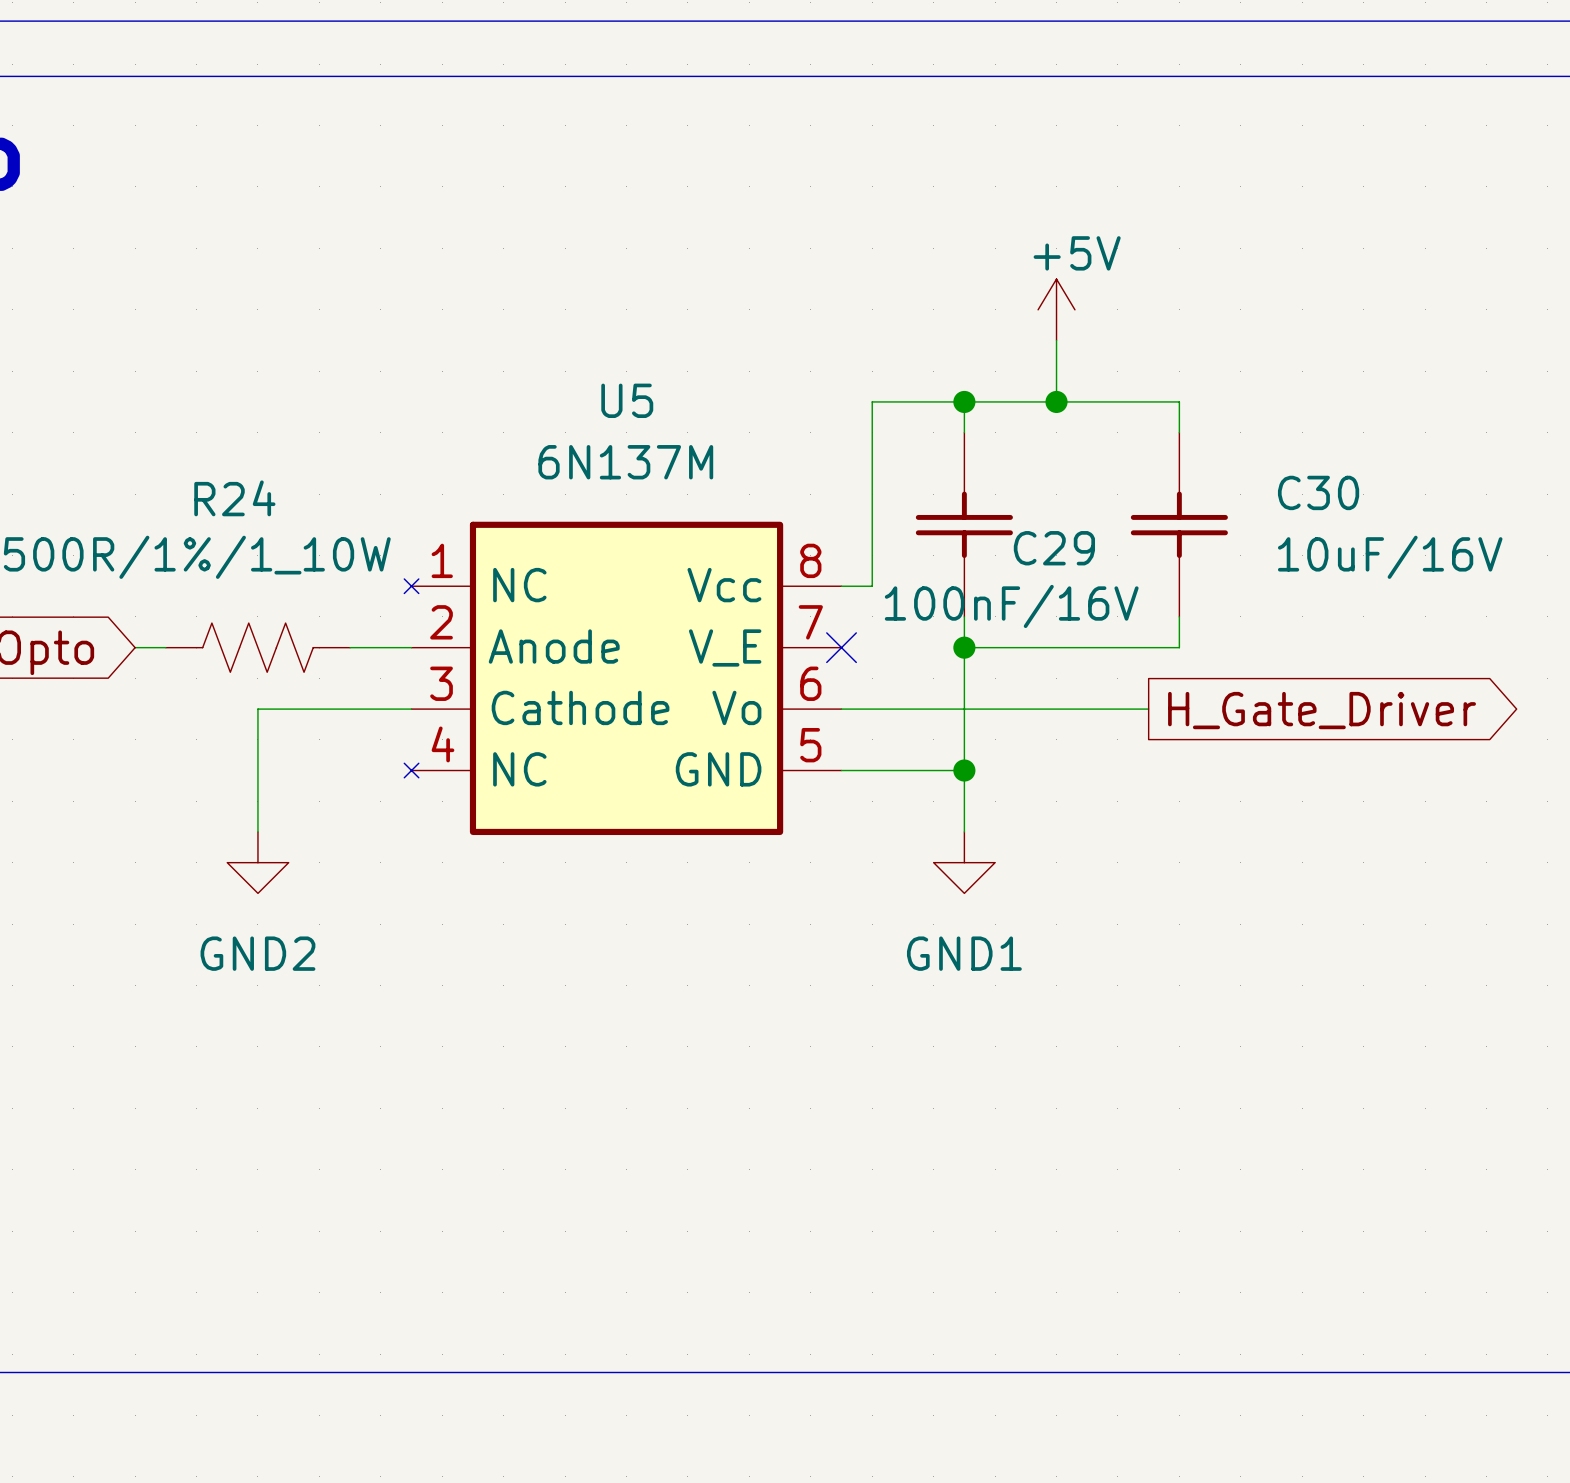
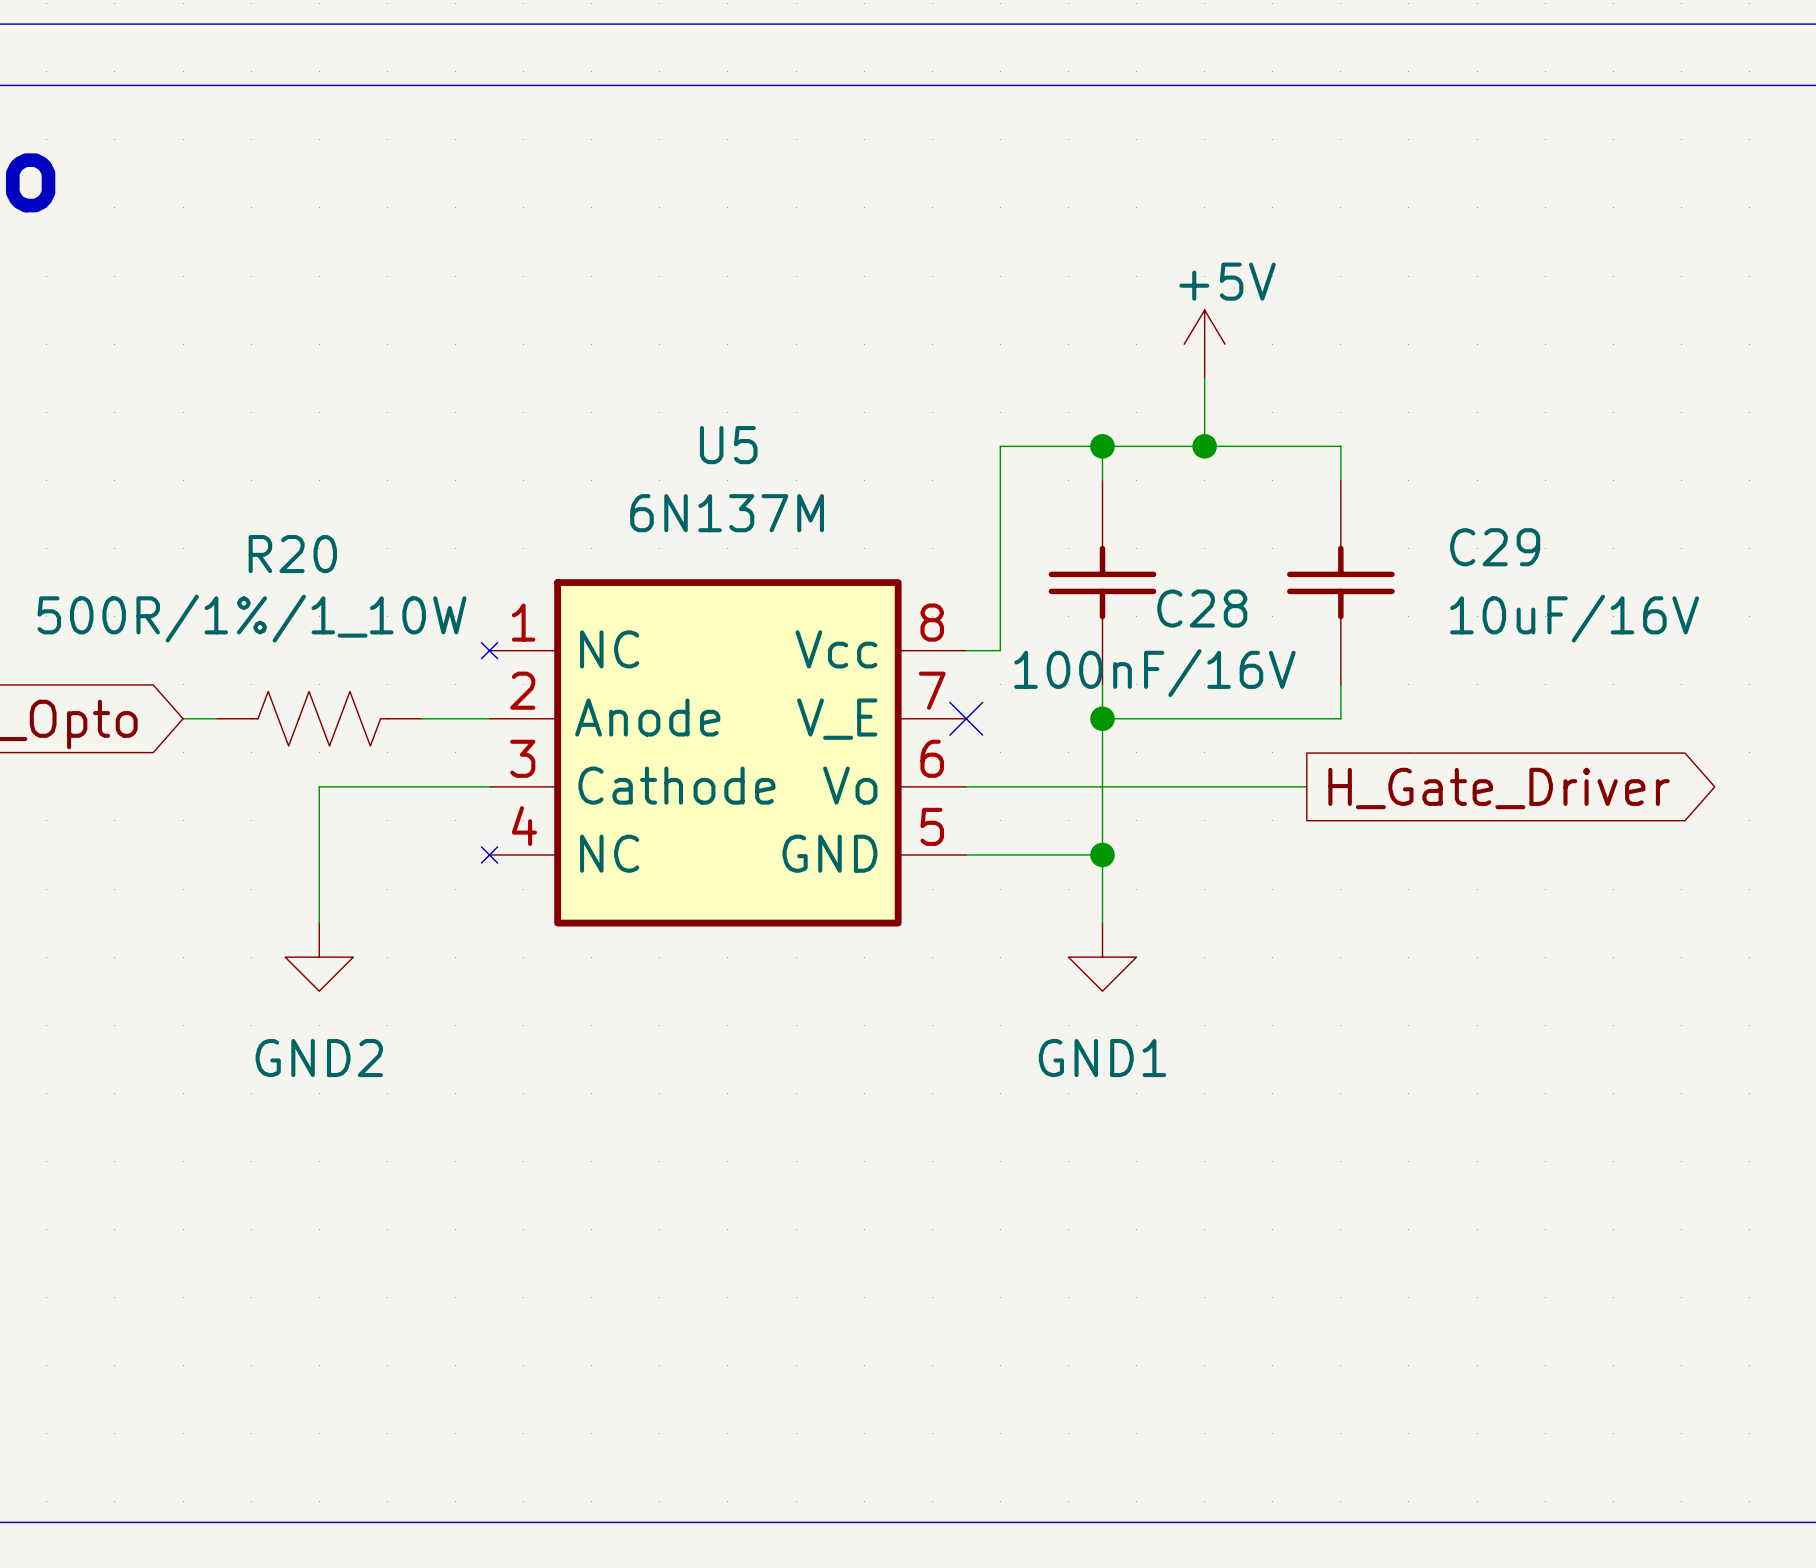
C30 name: C30 (1318, 492) -> C29 (1495, 547)
R24 name: R24 (234, 498) -> R20 (292, 554)
C29 name: C29 (1054, 548) -> C28 (1202, 608)

